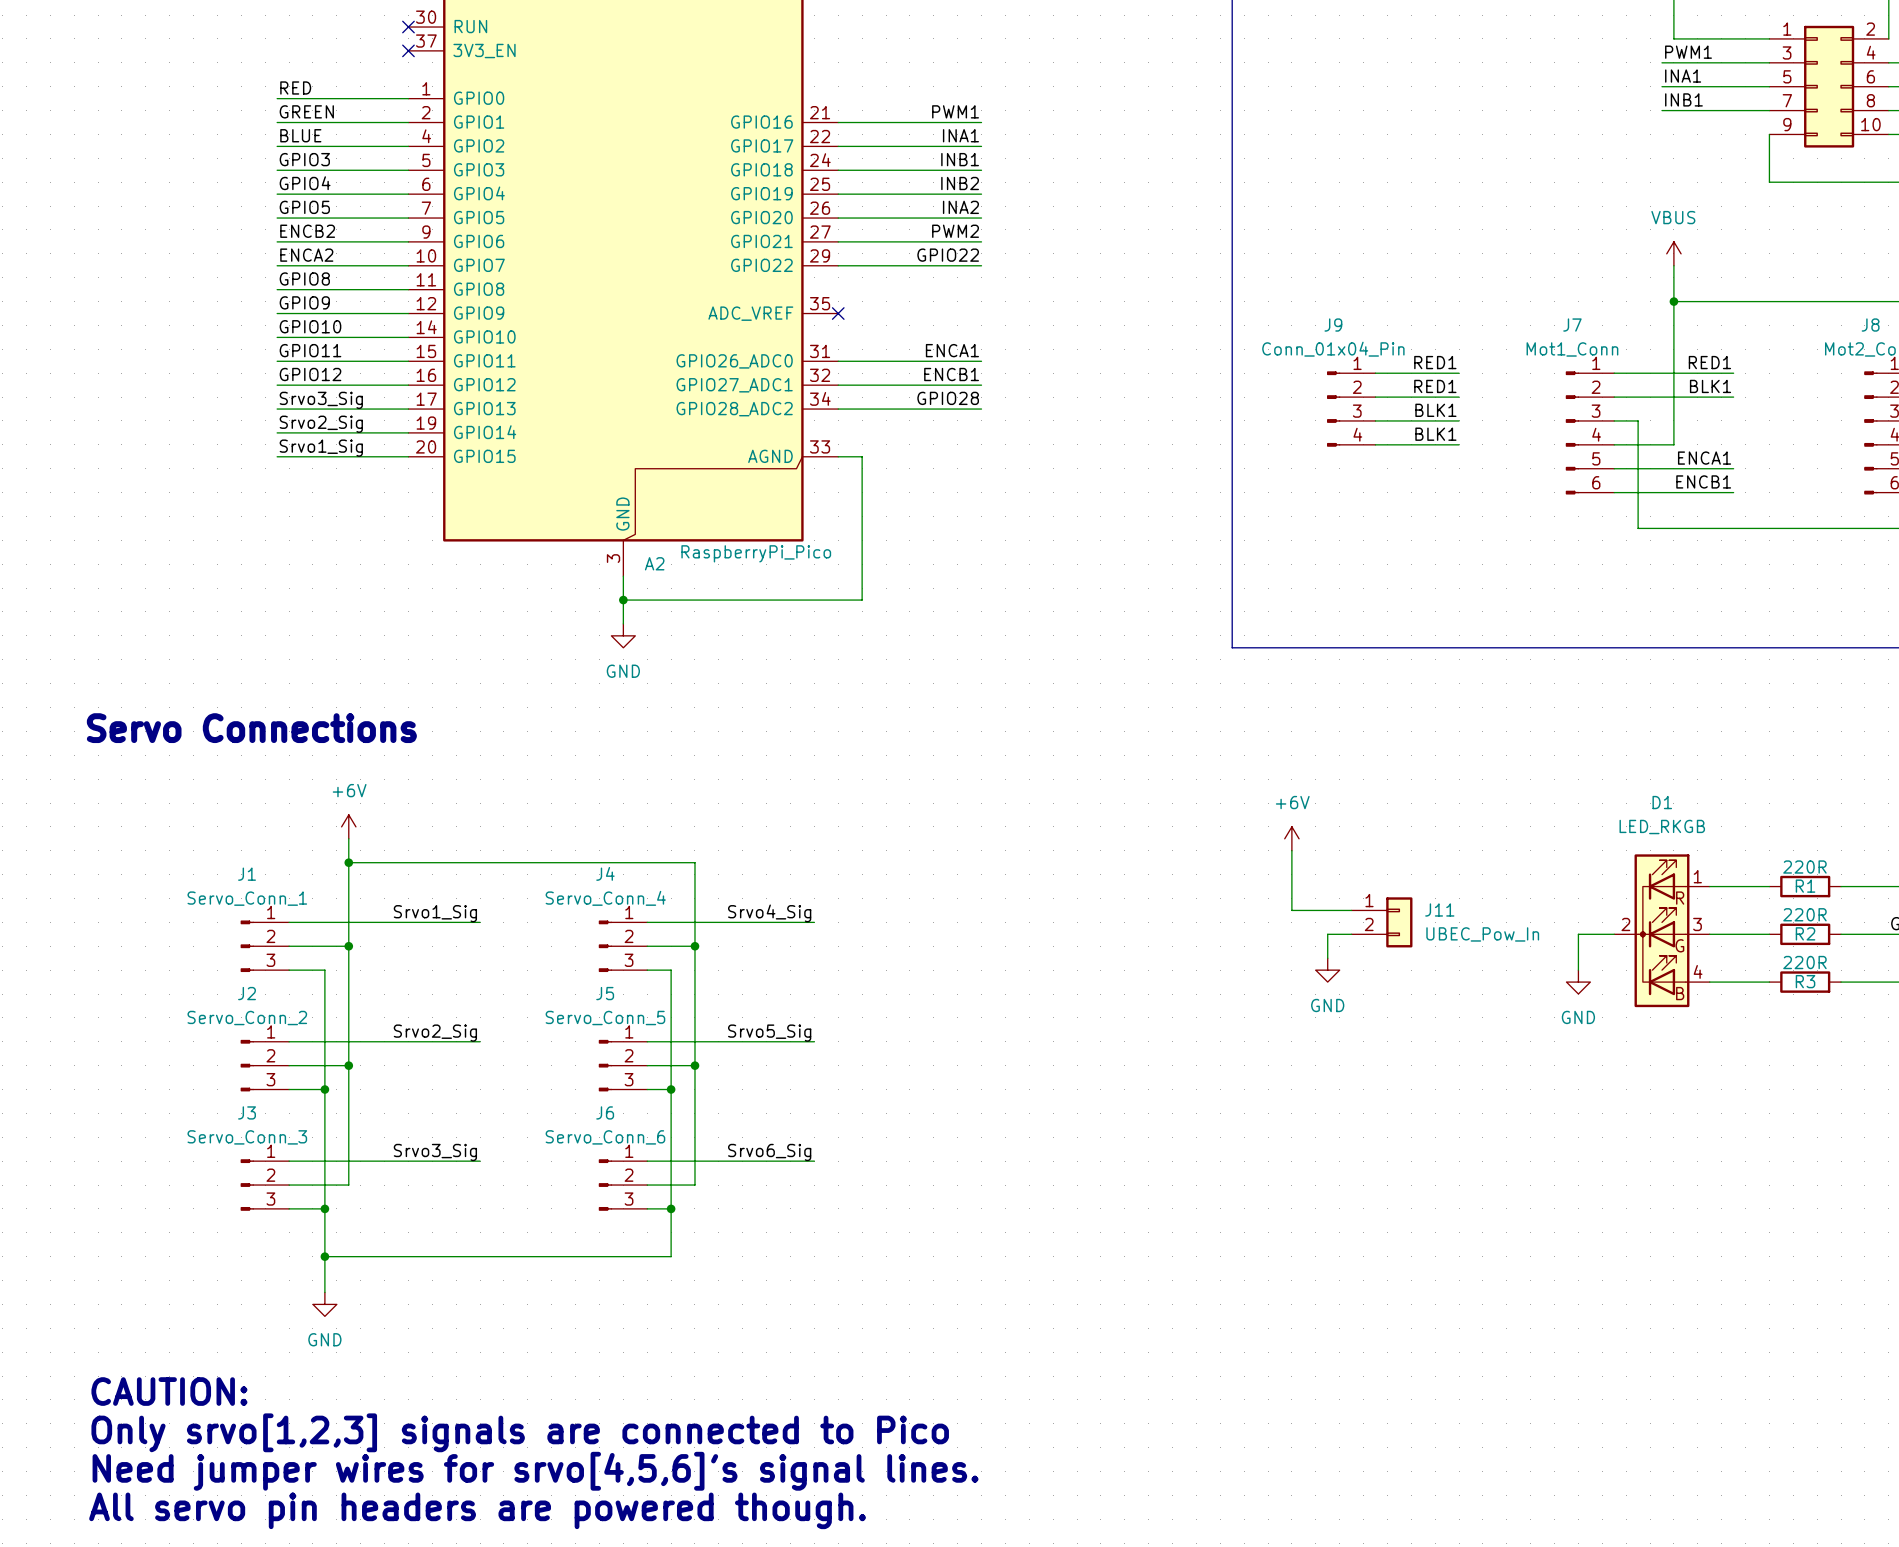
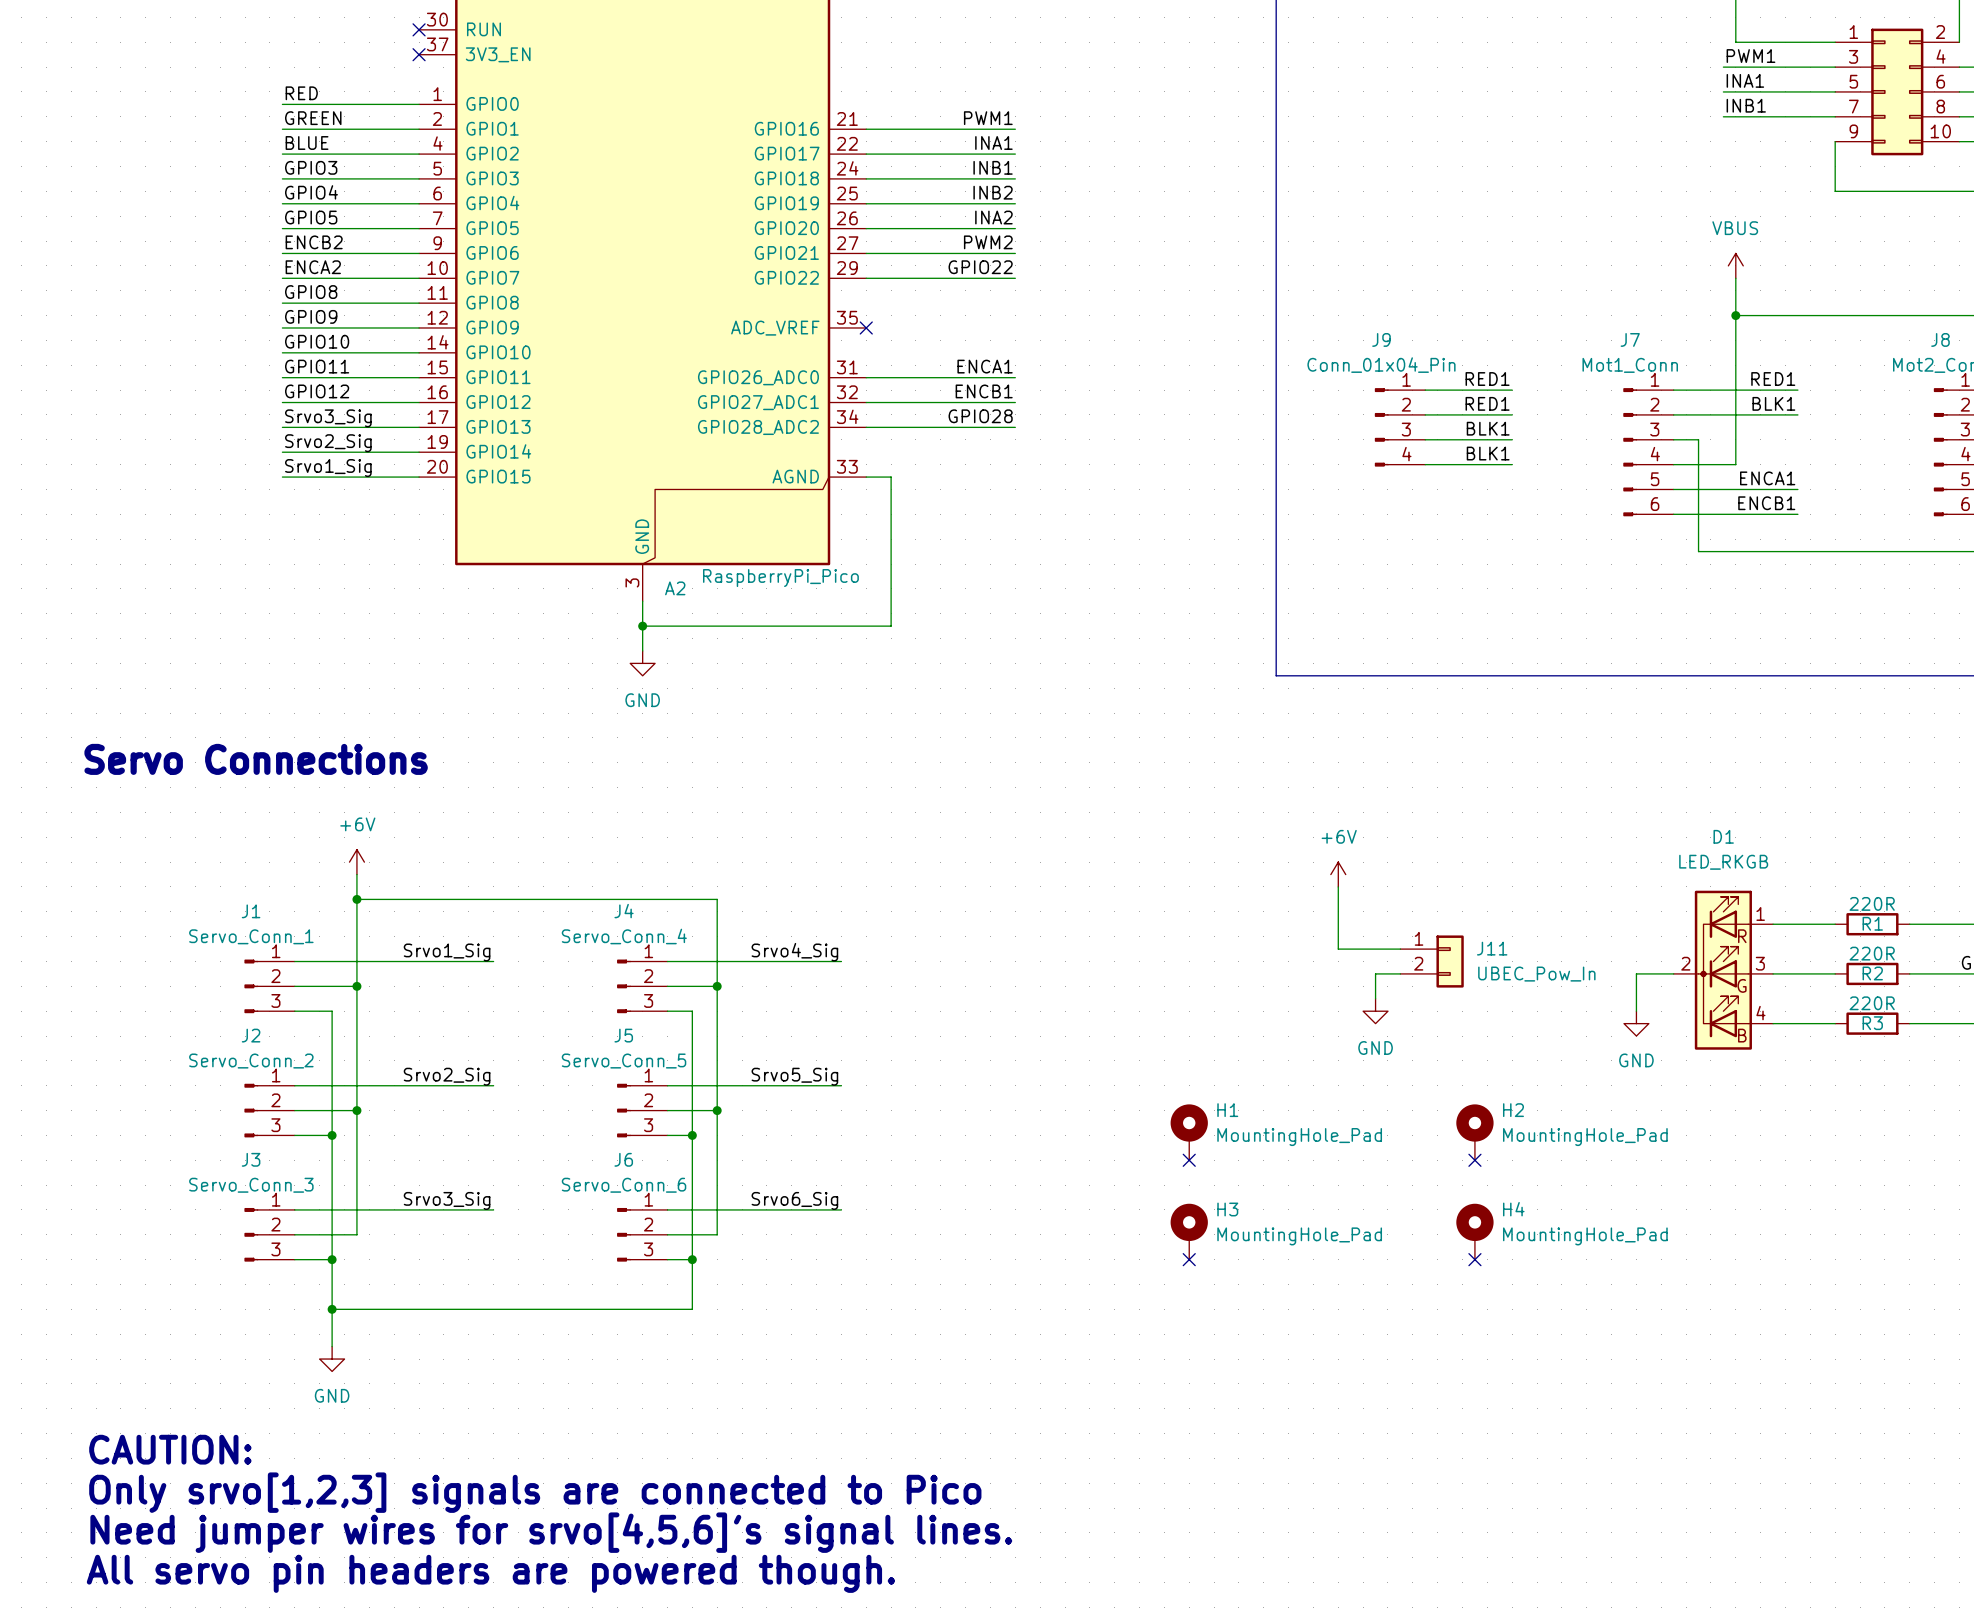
H1: none -> MountingHole_Pad (1189, 1132)
H2: none -> MountingHole_Pad (1474, 1132)
no-connect mark: none -> (1189, 1160)
no-connect mark: none -> (1474, 1160)
H3: none -> MountingHole_Pad (1189, 1231)
H4: none -> MountingHole_Pad (1474, 1231)
no-connect mark: none -> (1189, 1259)
no-connect mark: none -> (1474, 1259)

